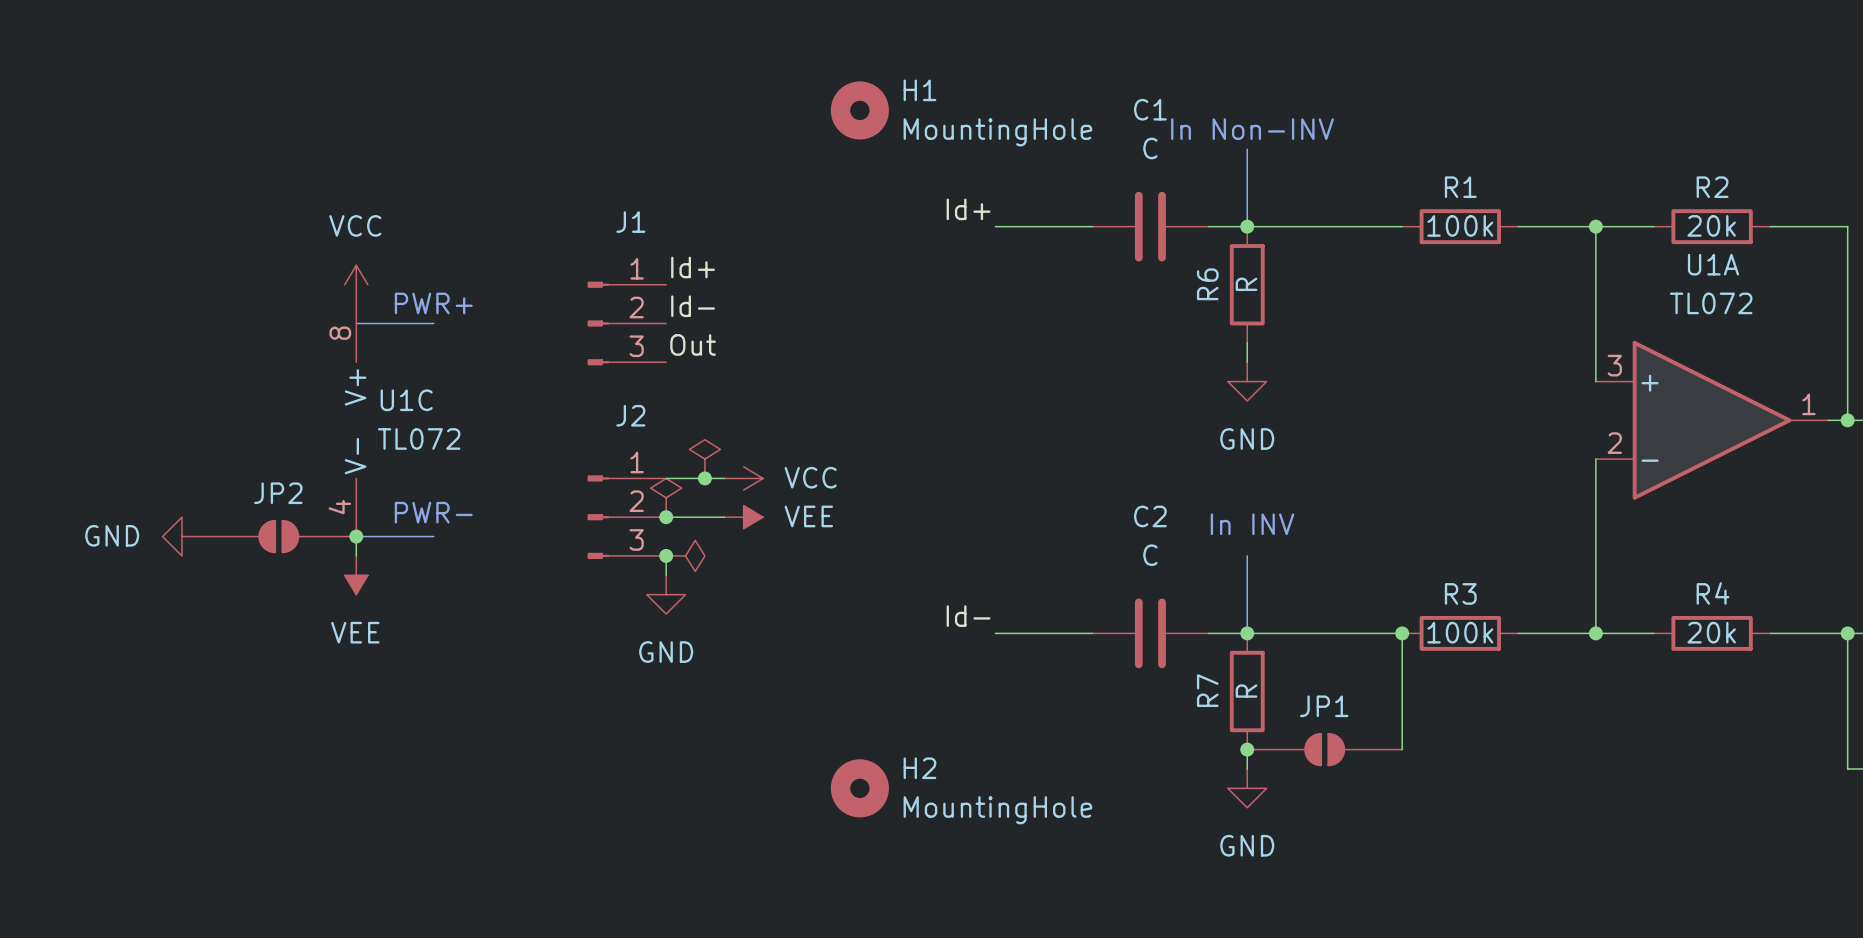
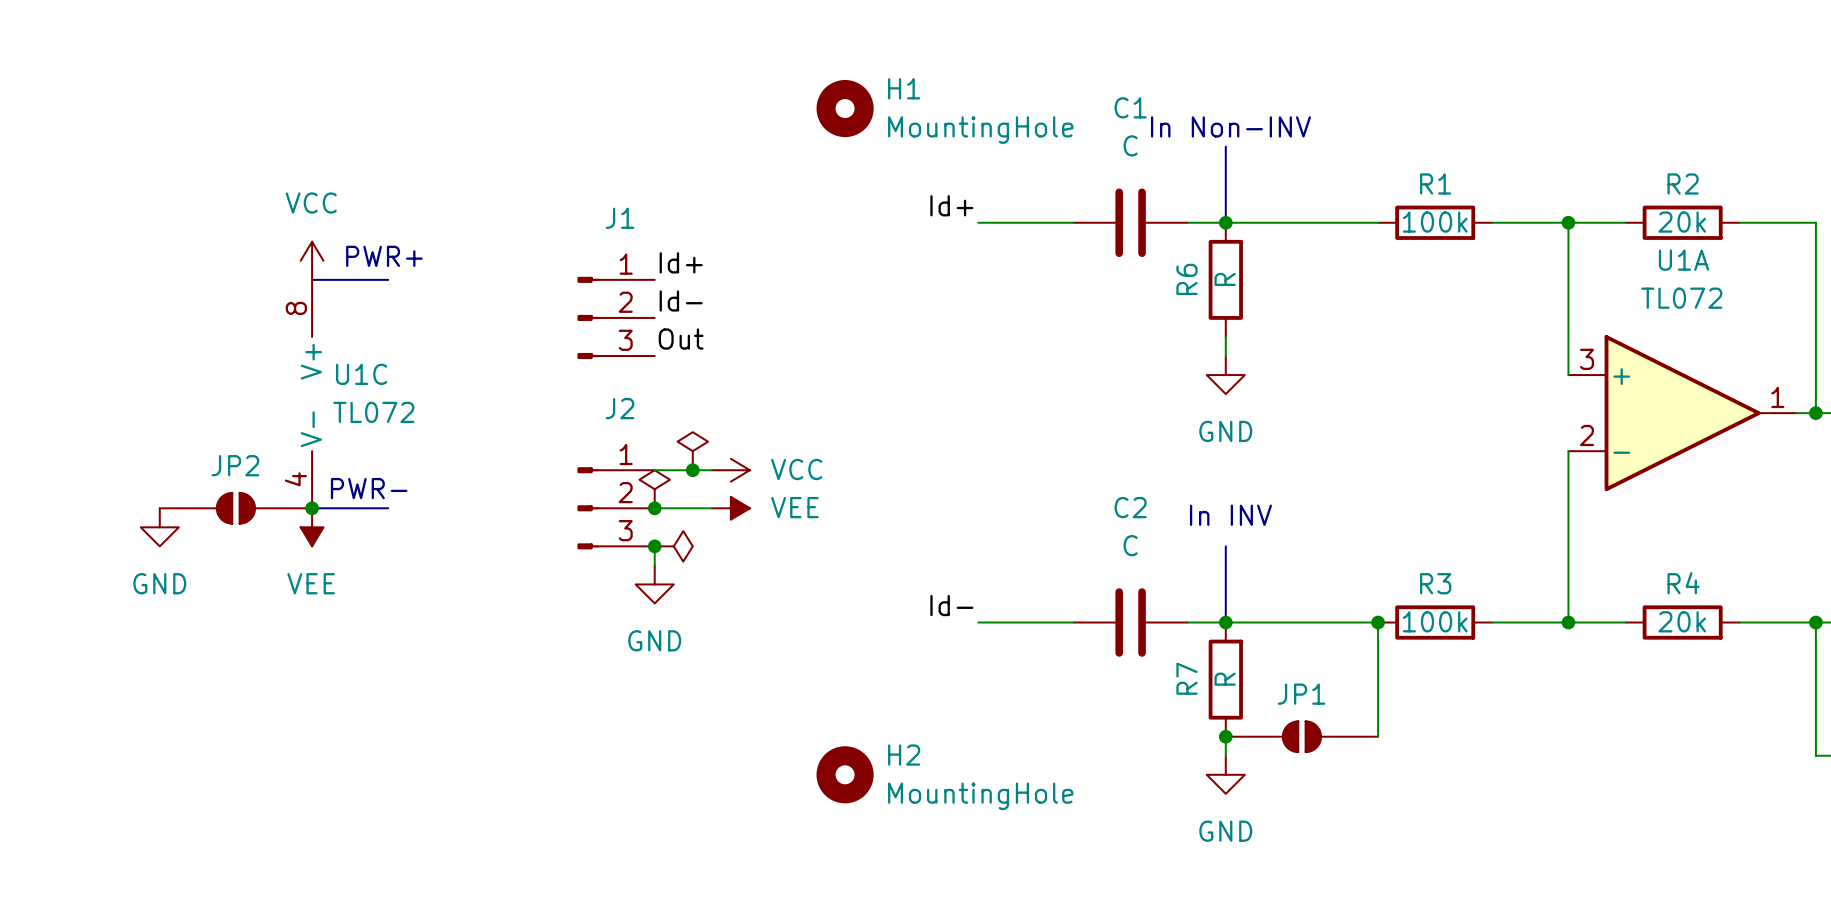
power symbol position: VCC (356, 284) -> VCC (312, 260)
text position: PWR+ (433, 303) -> PWR+ (384, 256)
line: (356, 323) (433, 323) -> (312, 279) (388, 279)
U1C position: (356, 420) -> (312, 394)
text position: PWR- (433, 512) -> PWR- (369, 488)
power symbol rotation: 0° (181, 536) -> 90° counterclockwise (159, 527)
JP2 position: (278, 536) -> (235, 508)
wire: (356, 536) (356, 555) -> none
line: (356, 536) (433, 536) -> (312, 508) (388, 508)
junction position: (356, 536) -> (312, 508)
power symbol position: VEE (356, 575) -> VEE (312, 527)

